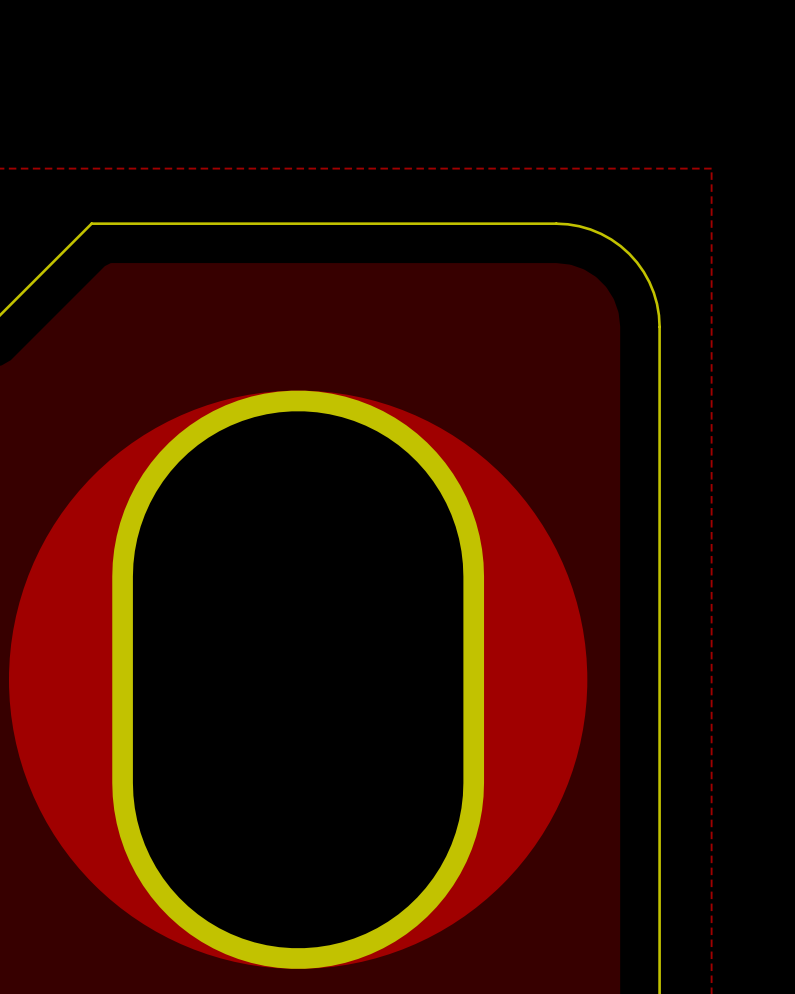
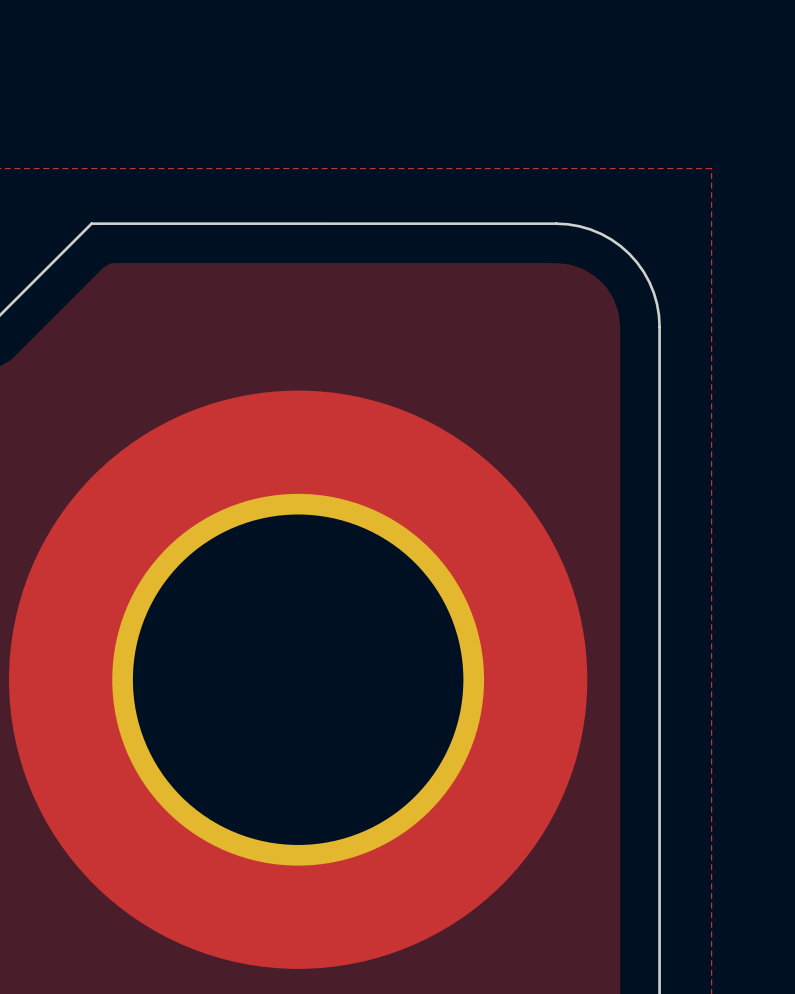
part footprint: [8, 390, 588, 969] -> [8, 390, 588, 969]

